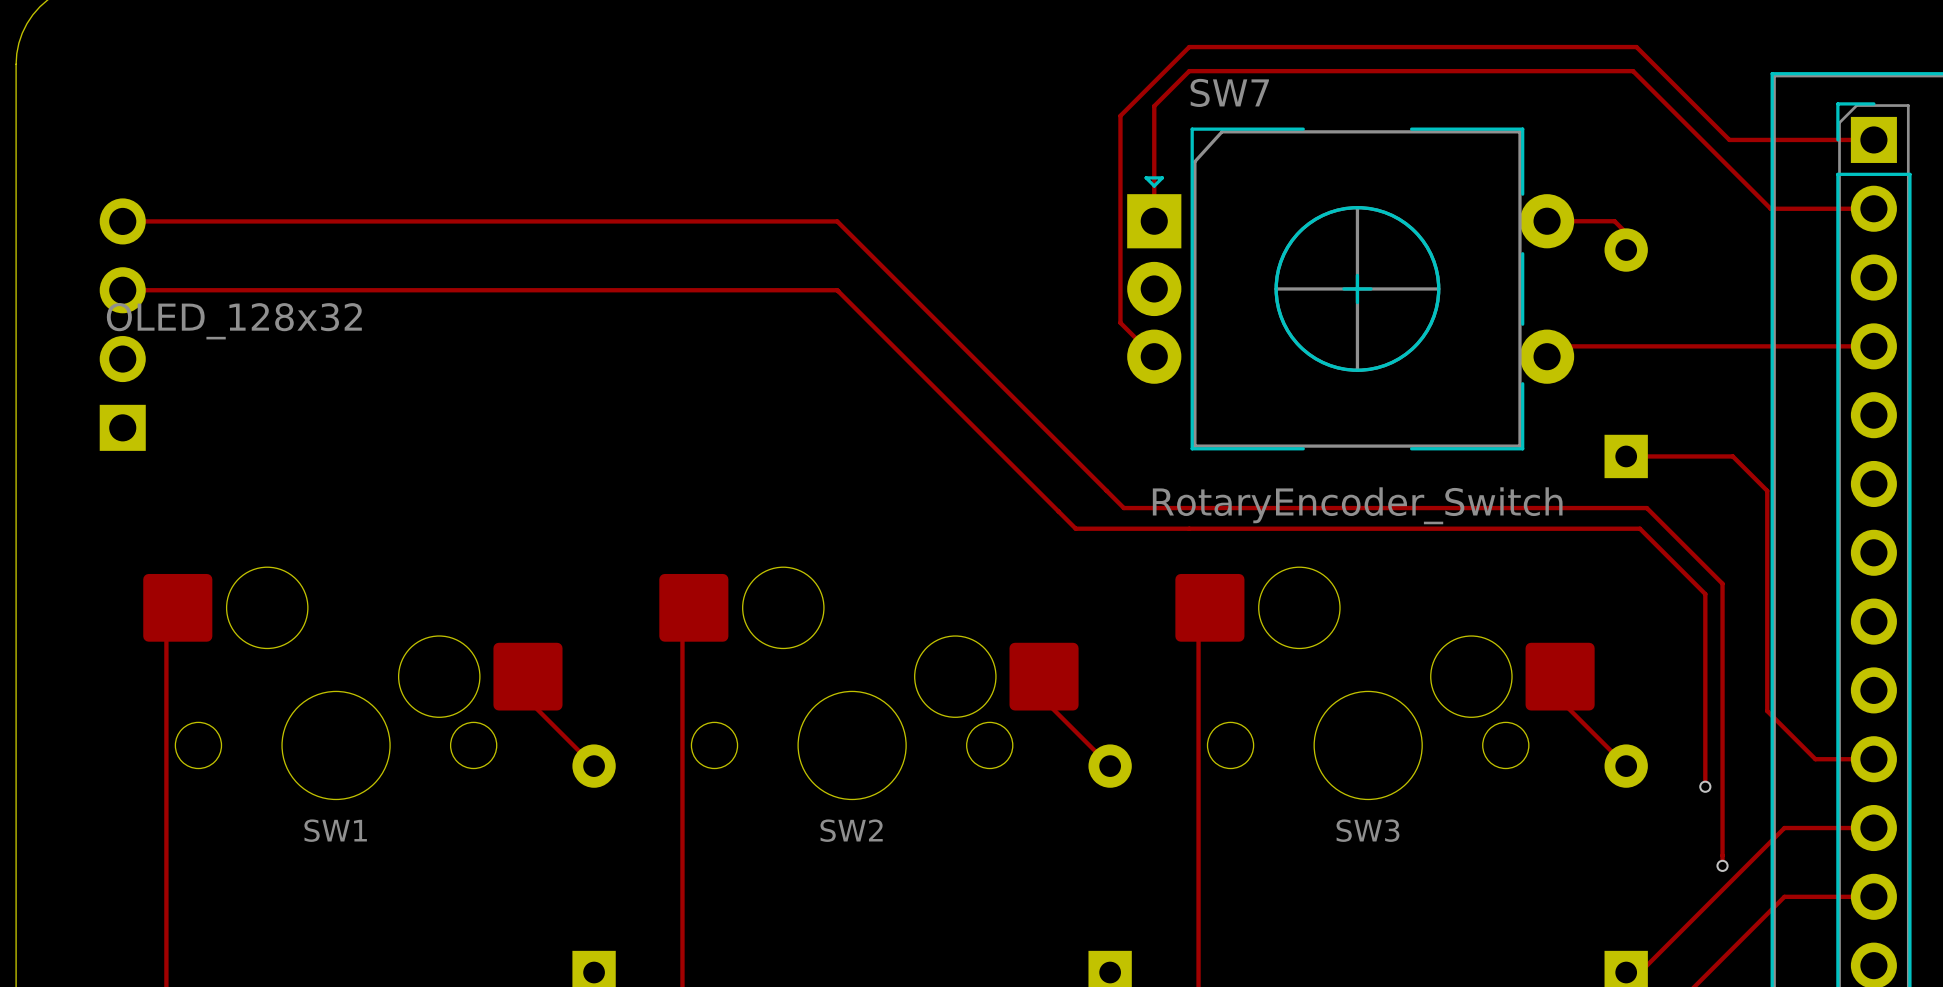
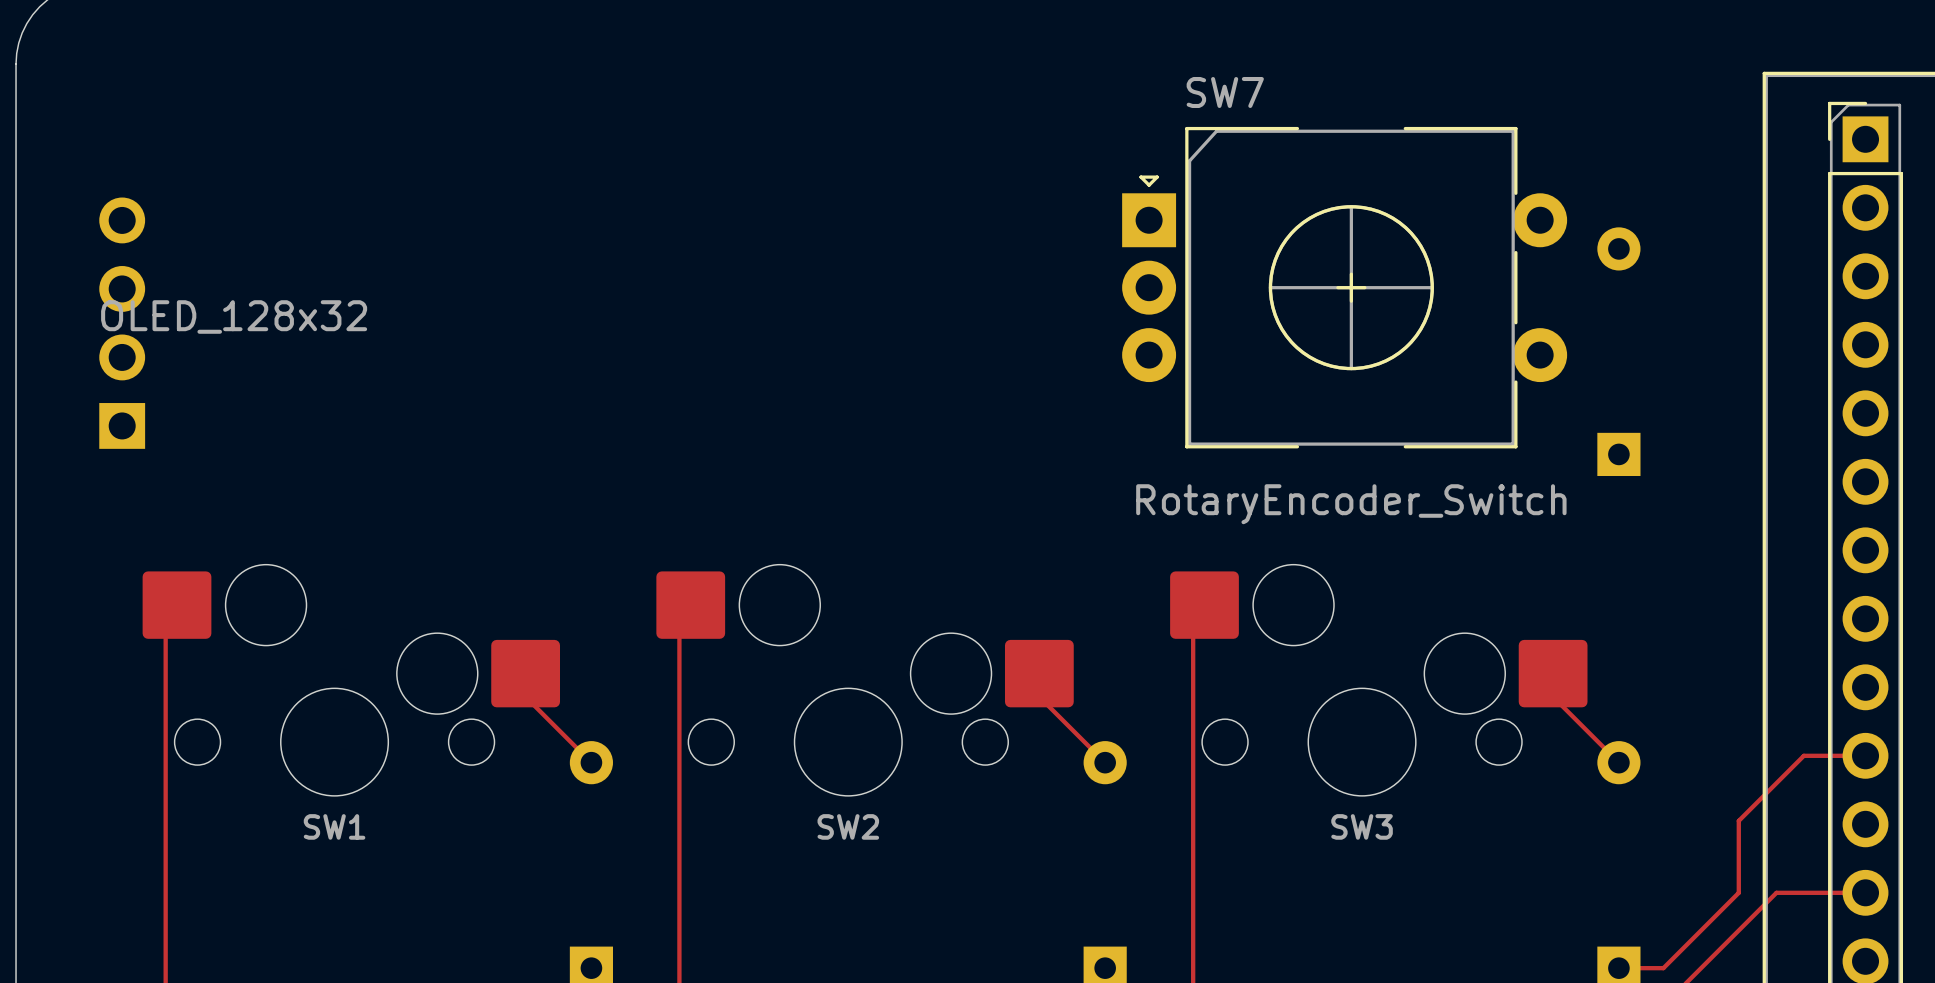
track: (1873, 139) (1729, 139) (1636, 47) (1189, 47) (1120, 115) (1120, 322) (1154, 356) -> none
track: (1873, 208) (1770, 208) (1633, 71) (1189, 71) (1154, 106) (1154, 221) -> none
track: (122, 221) (837, 221) (1123, 508) (1646, 508) (1722, 583) (1722, 865) -> none
track: (1547, 221) (1614, 221) (1626, 232) (1626, 250) -> none
track: (122, 290) (837, 290) (1075, 528) (1639, 528) (1705, 594) (1705, 786) -> none
track: (1873, 346) (1557, 346) (1547, 356) -> none
track: (1626, 456) (1732, 456) (1767, 490) (1767, 711) (1815, 759) -> none
via: (1705, 786) -> none
track: (1873, 828) (1784, 828) (1639, 972) -> (1807, 755) (1803, 755) (1738, 820) (1738, 892) (1663, 968) (1632, 968)
via: (1722, 865) -> none

